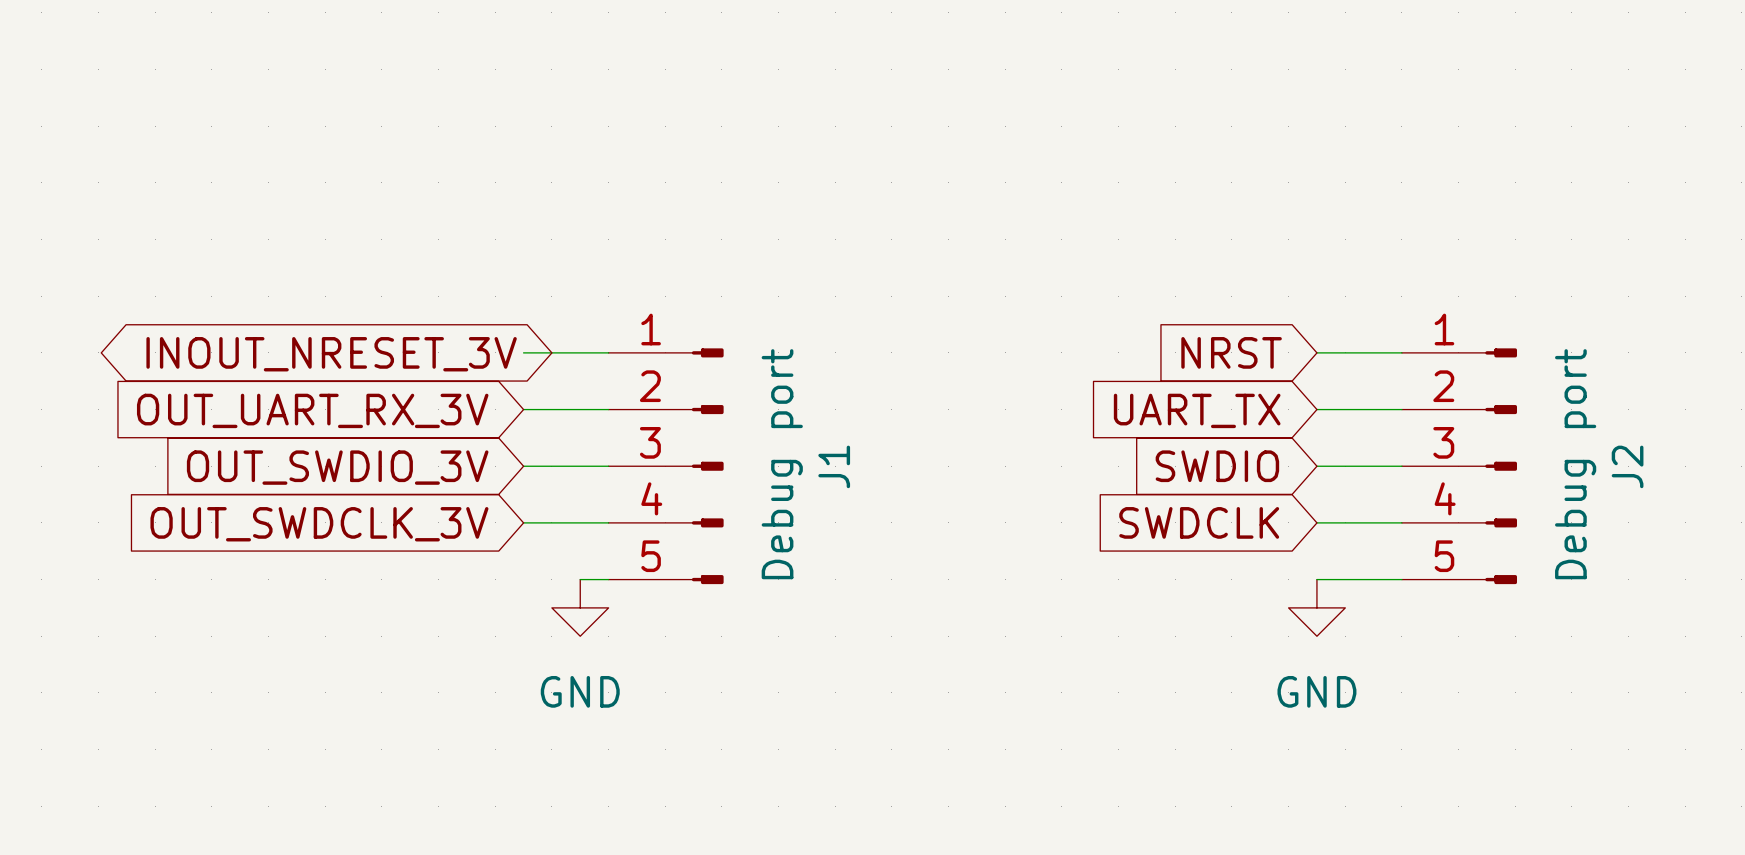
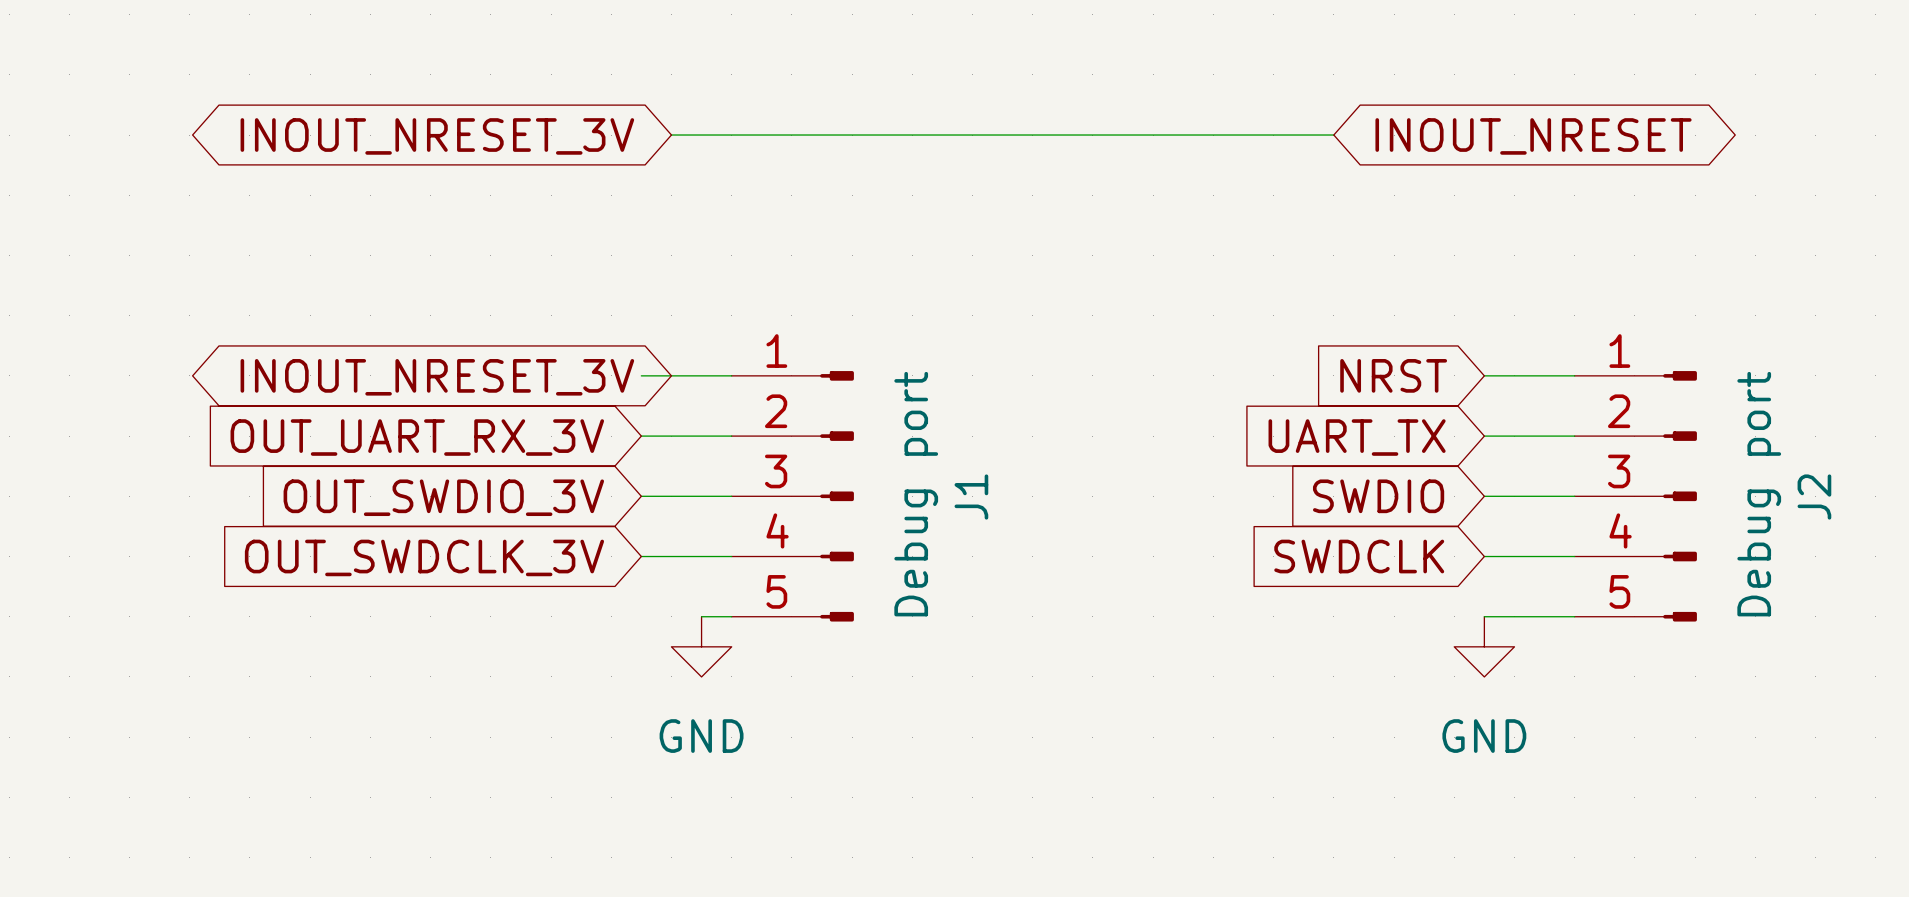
wire: none -> (671, 135) (1333, 135)
global label: none -> INOUT_NRESET_3V (437, 136)
global label: none -> INOUT_NRESET (1533, 136)

